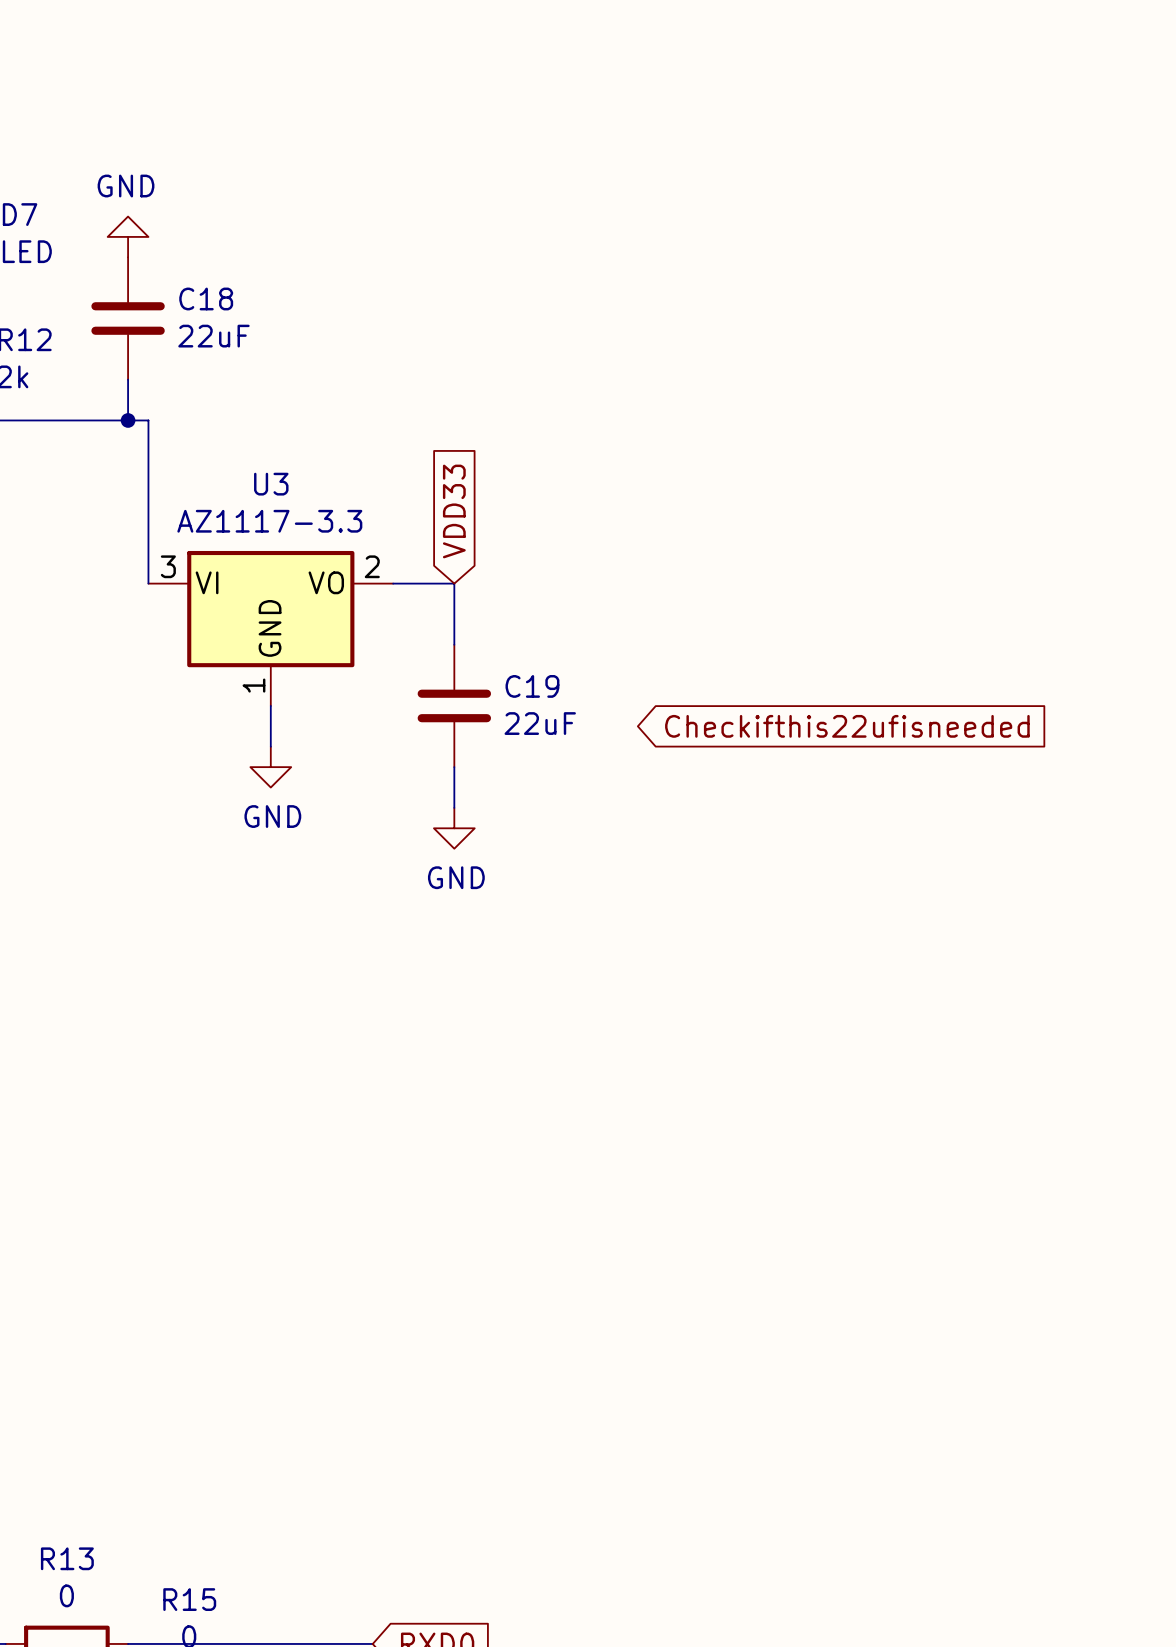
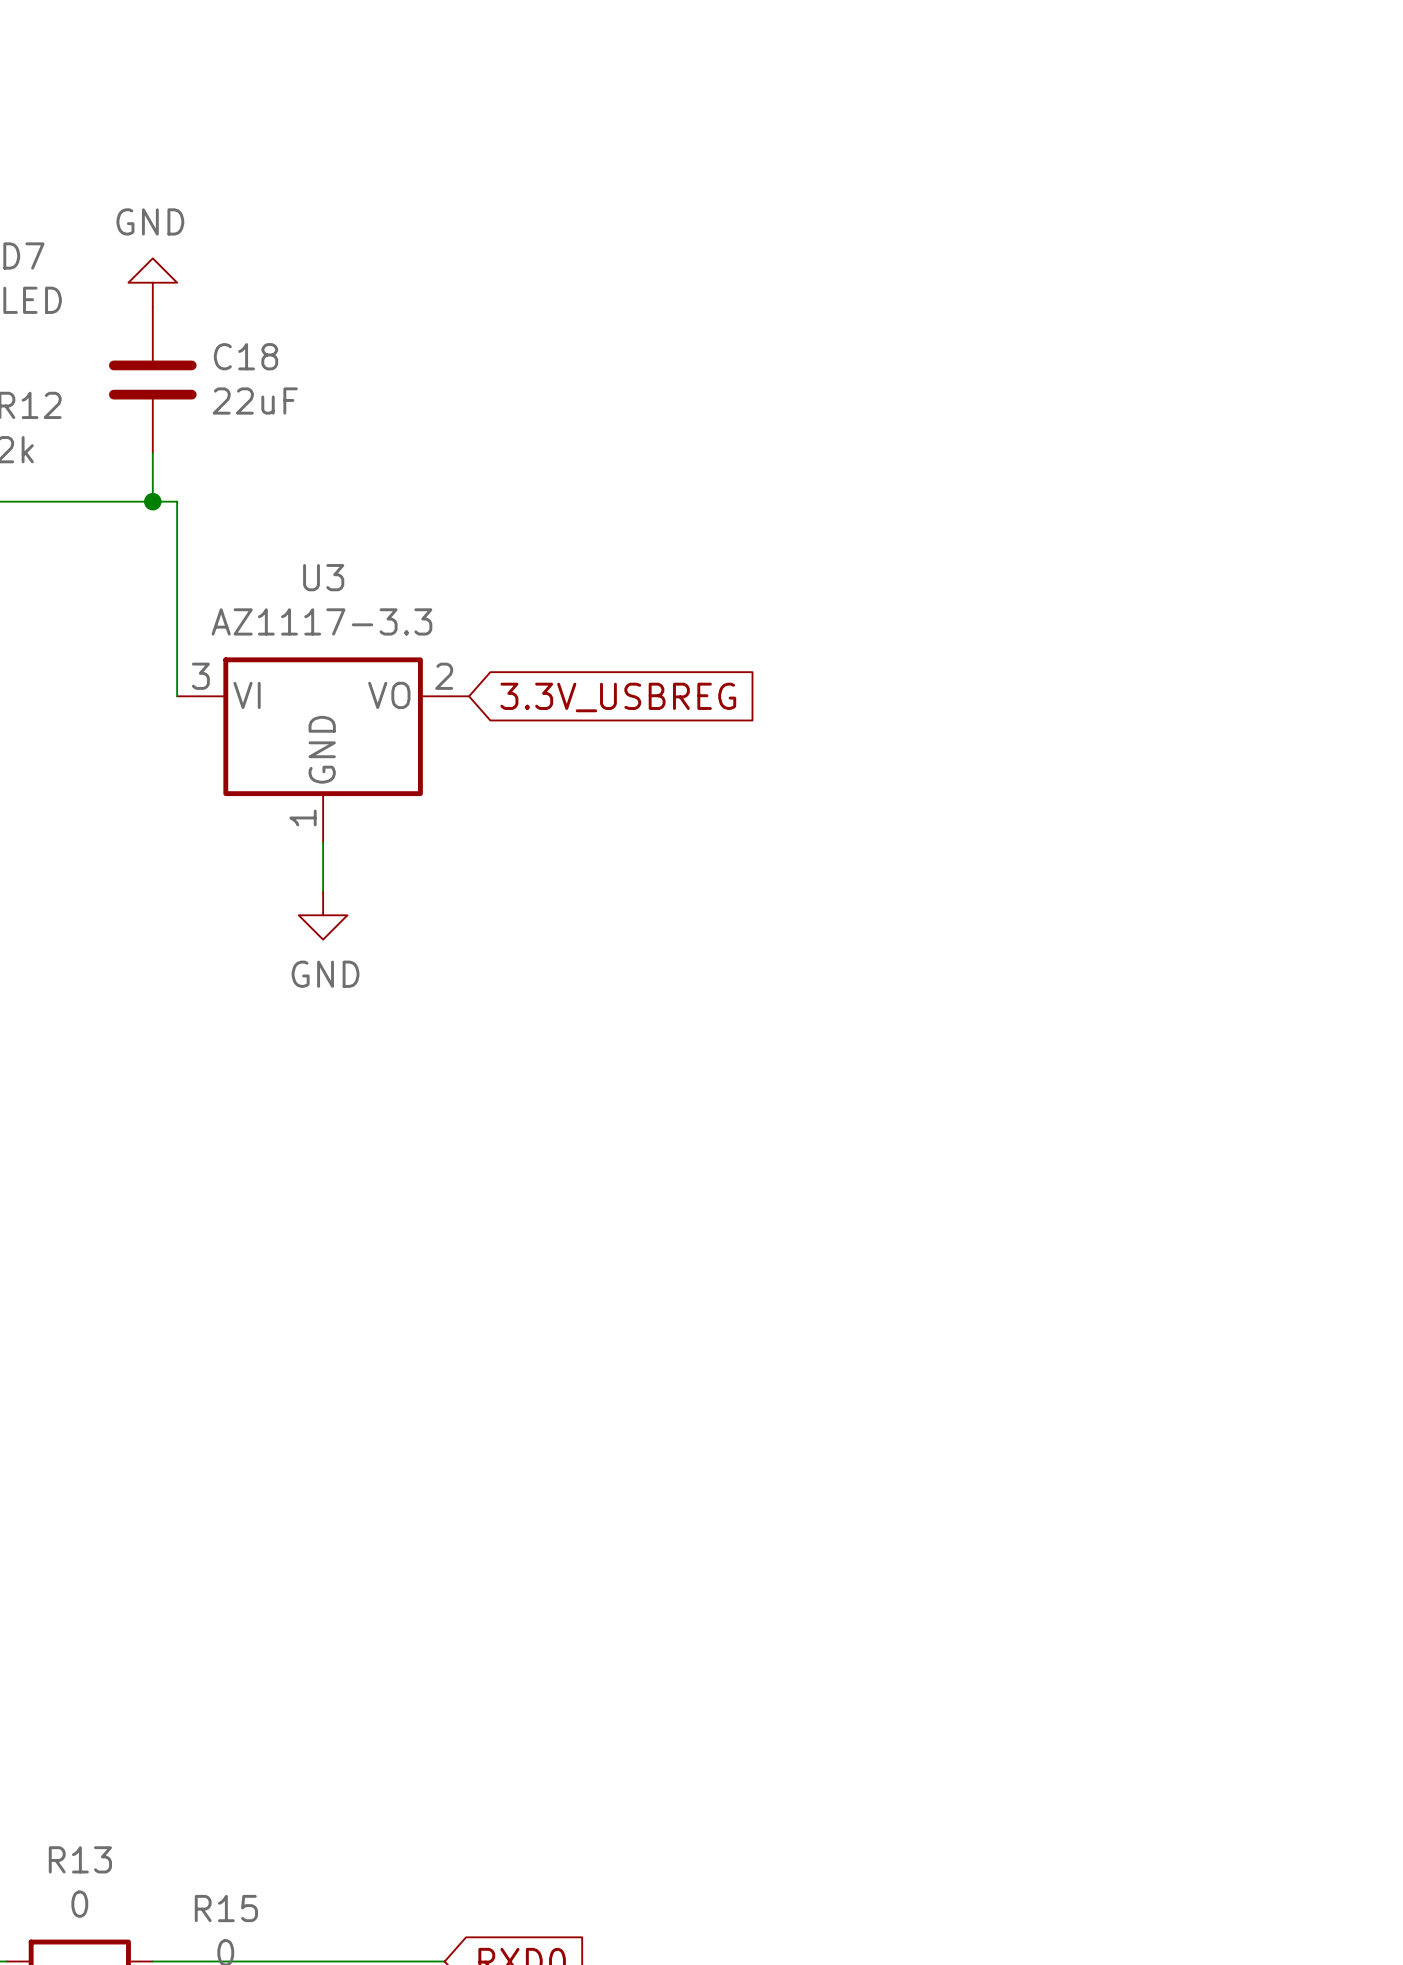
global label: VDD33 (454, 511) -> none
wire: (393, 583) (454, 583) (454, 644) -> none
global label: none -> 3.3V_USBREG (618, 697)
C19: 22uF (454, 705) -> none
global label: Checkifthis22ufisneeded (847, 726) -> none
wire: (454, 767) (454, 807) -> none
power symbol: GND (454, 828) -> none

